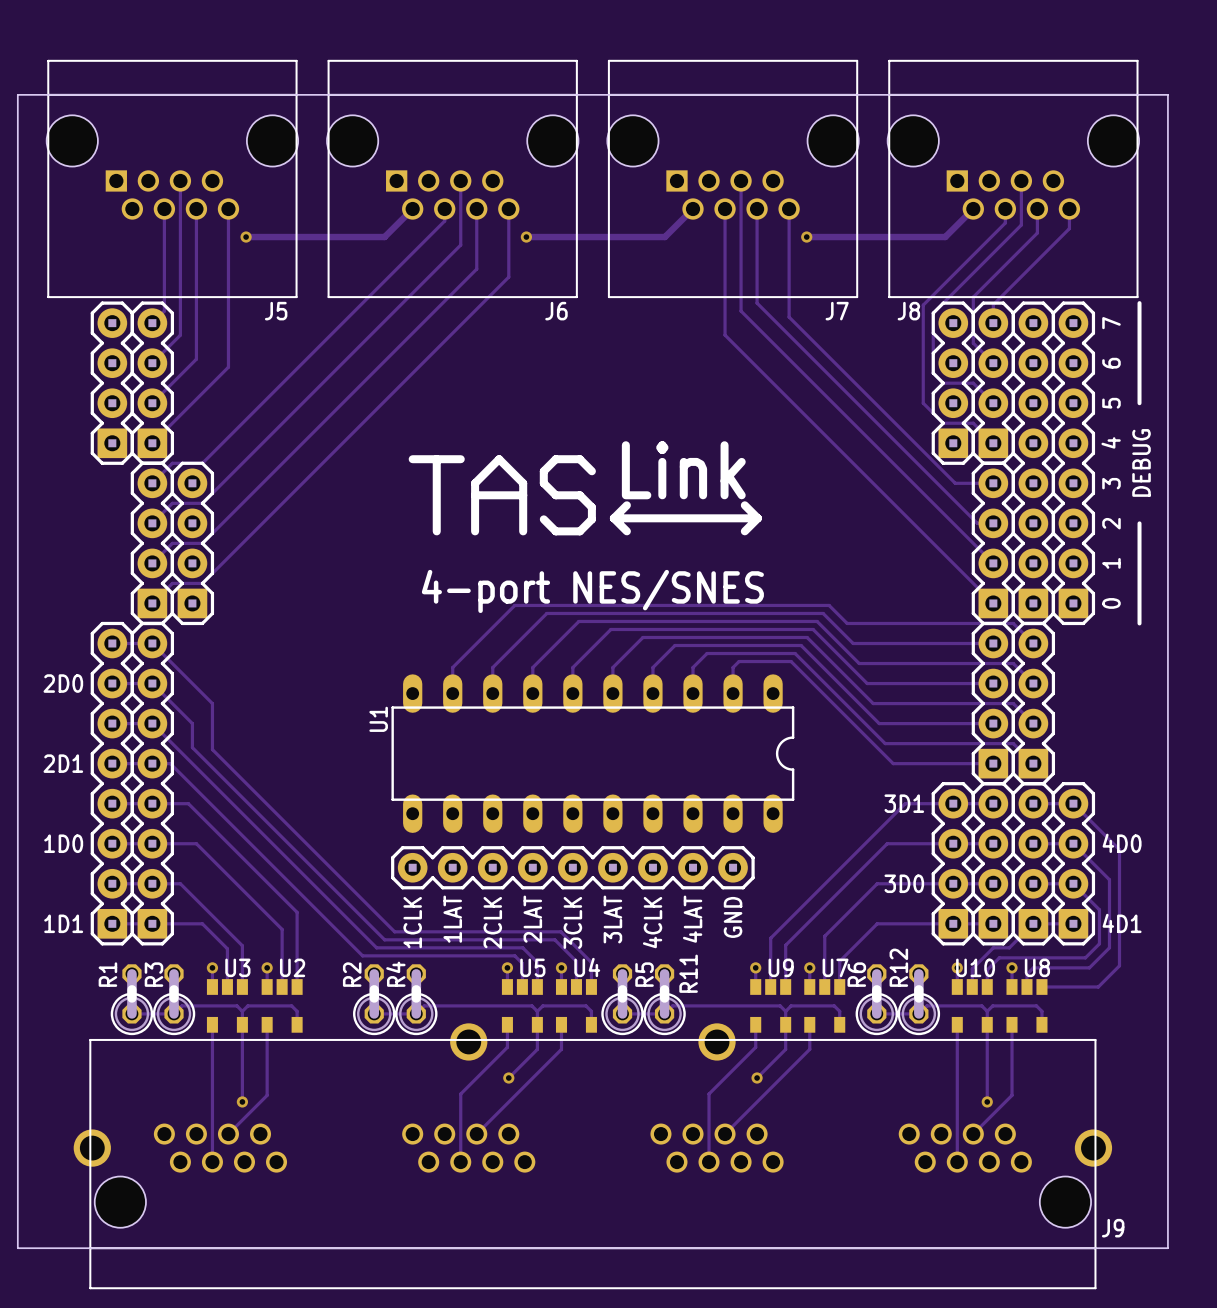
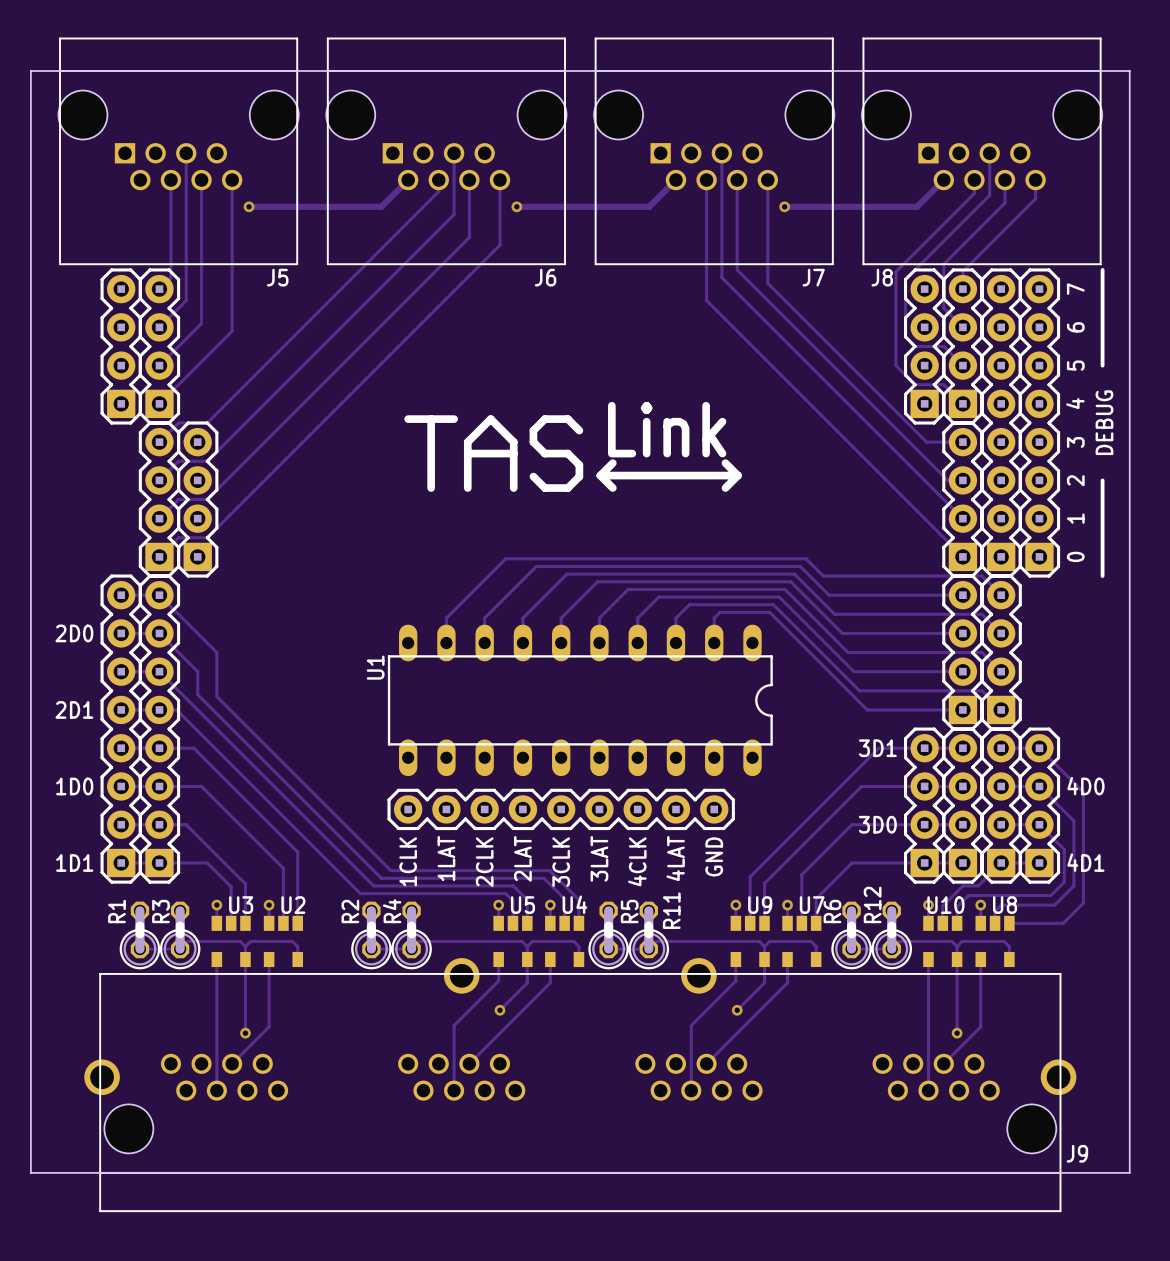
text: 4-port NES/SNES (592, 591) -> none

